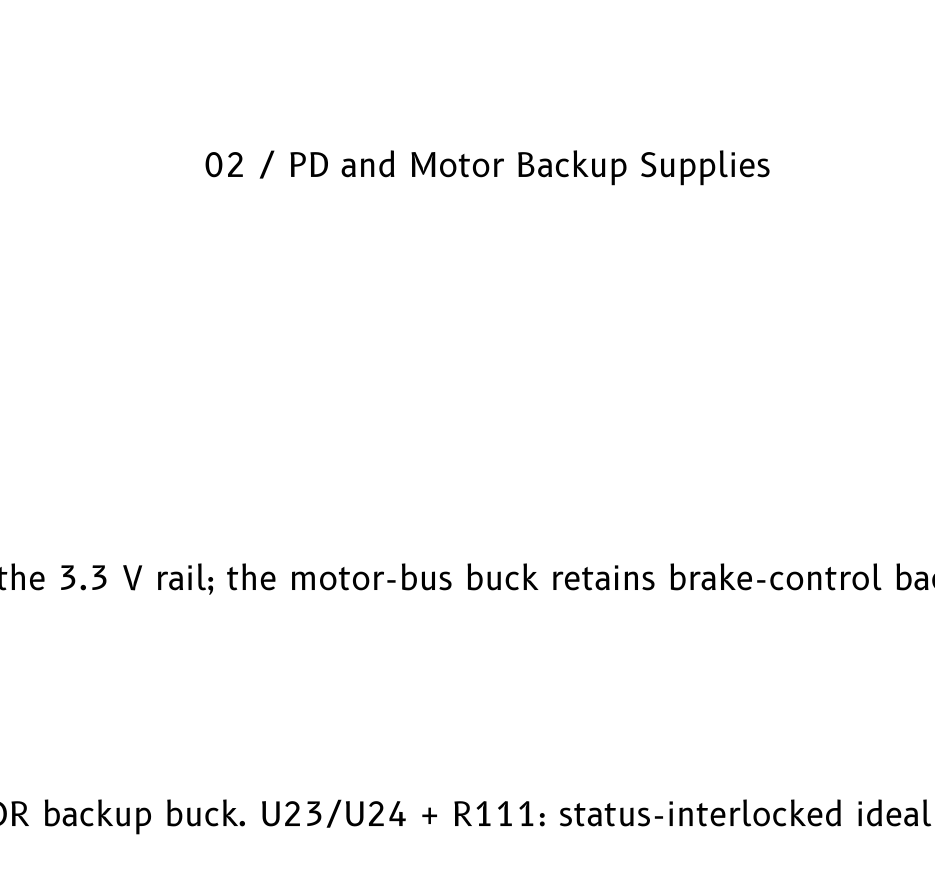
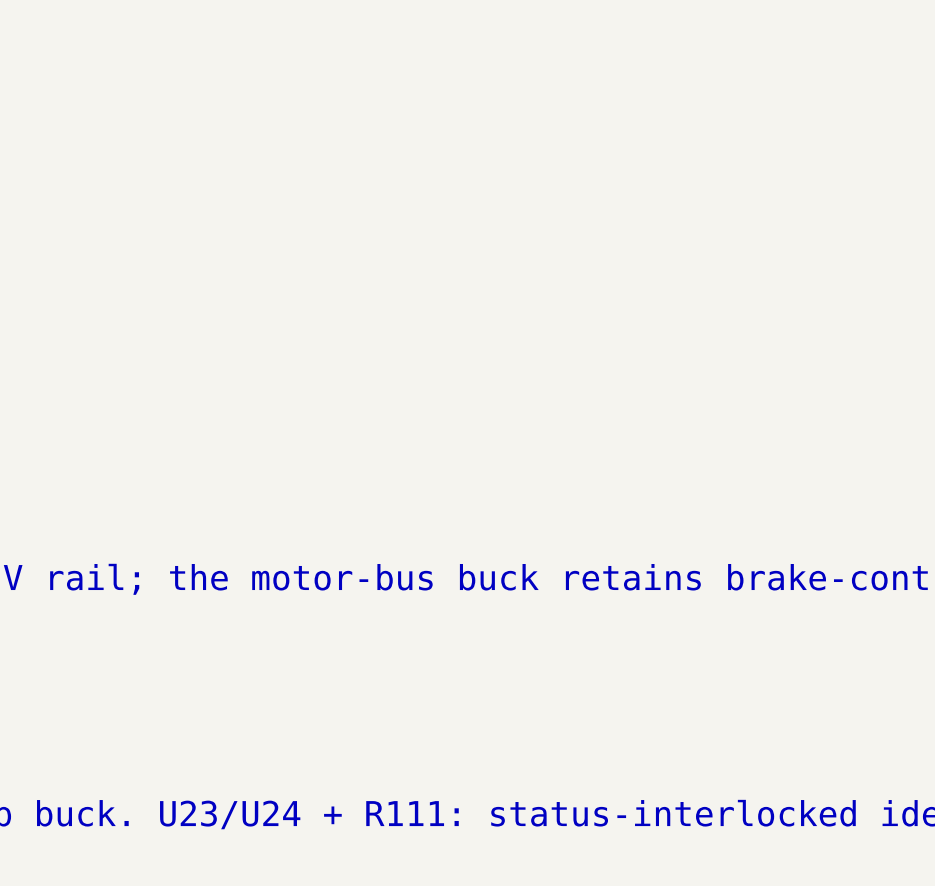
text: 02 / PD and Motor Backup Supplies (487, 167) -> none

